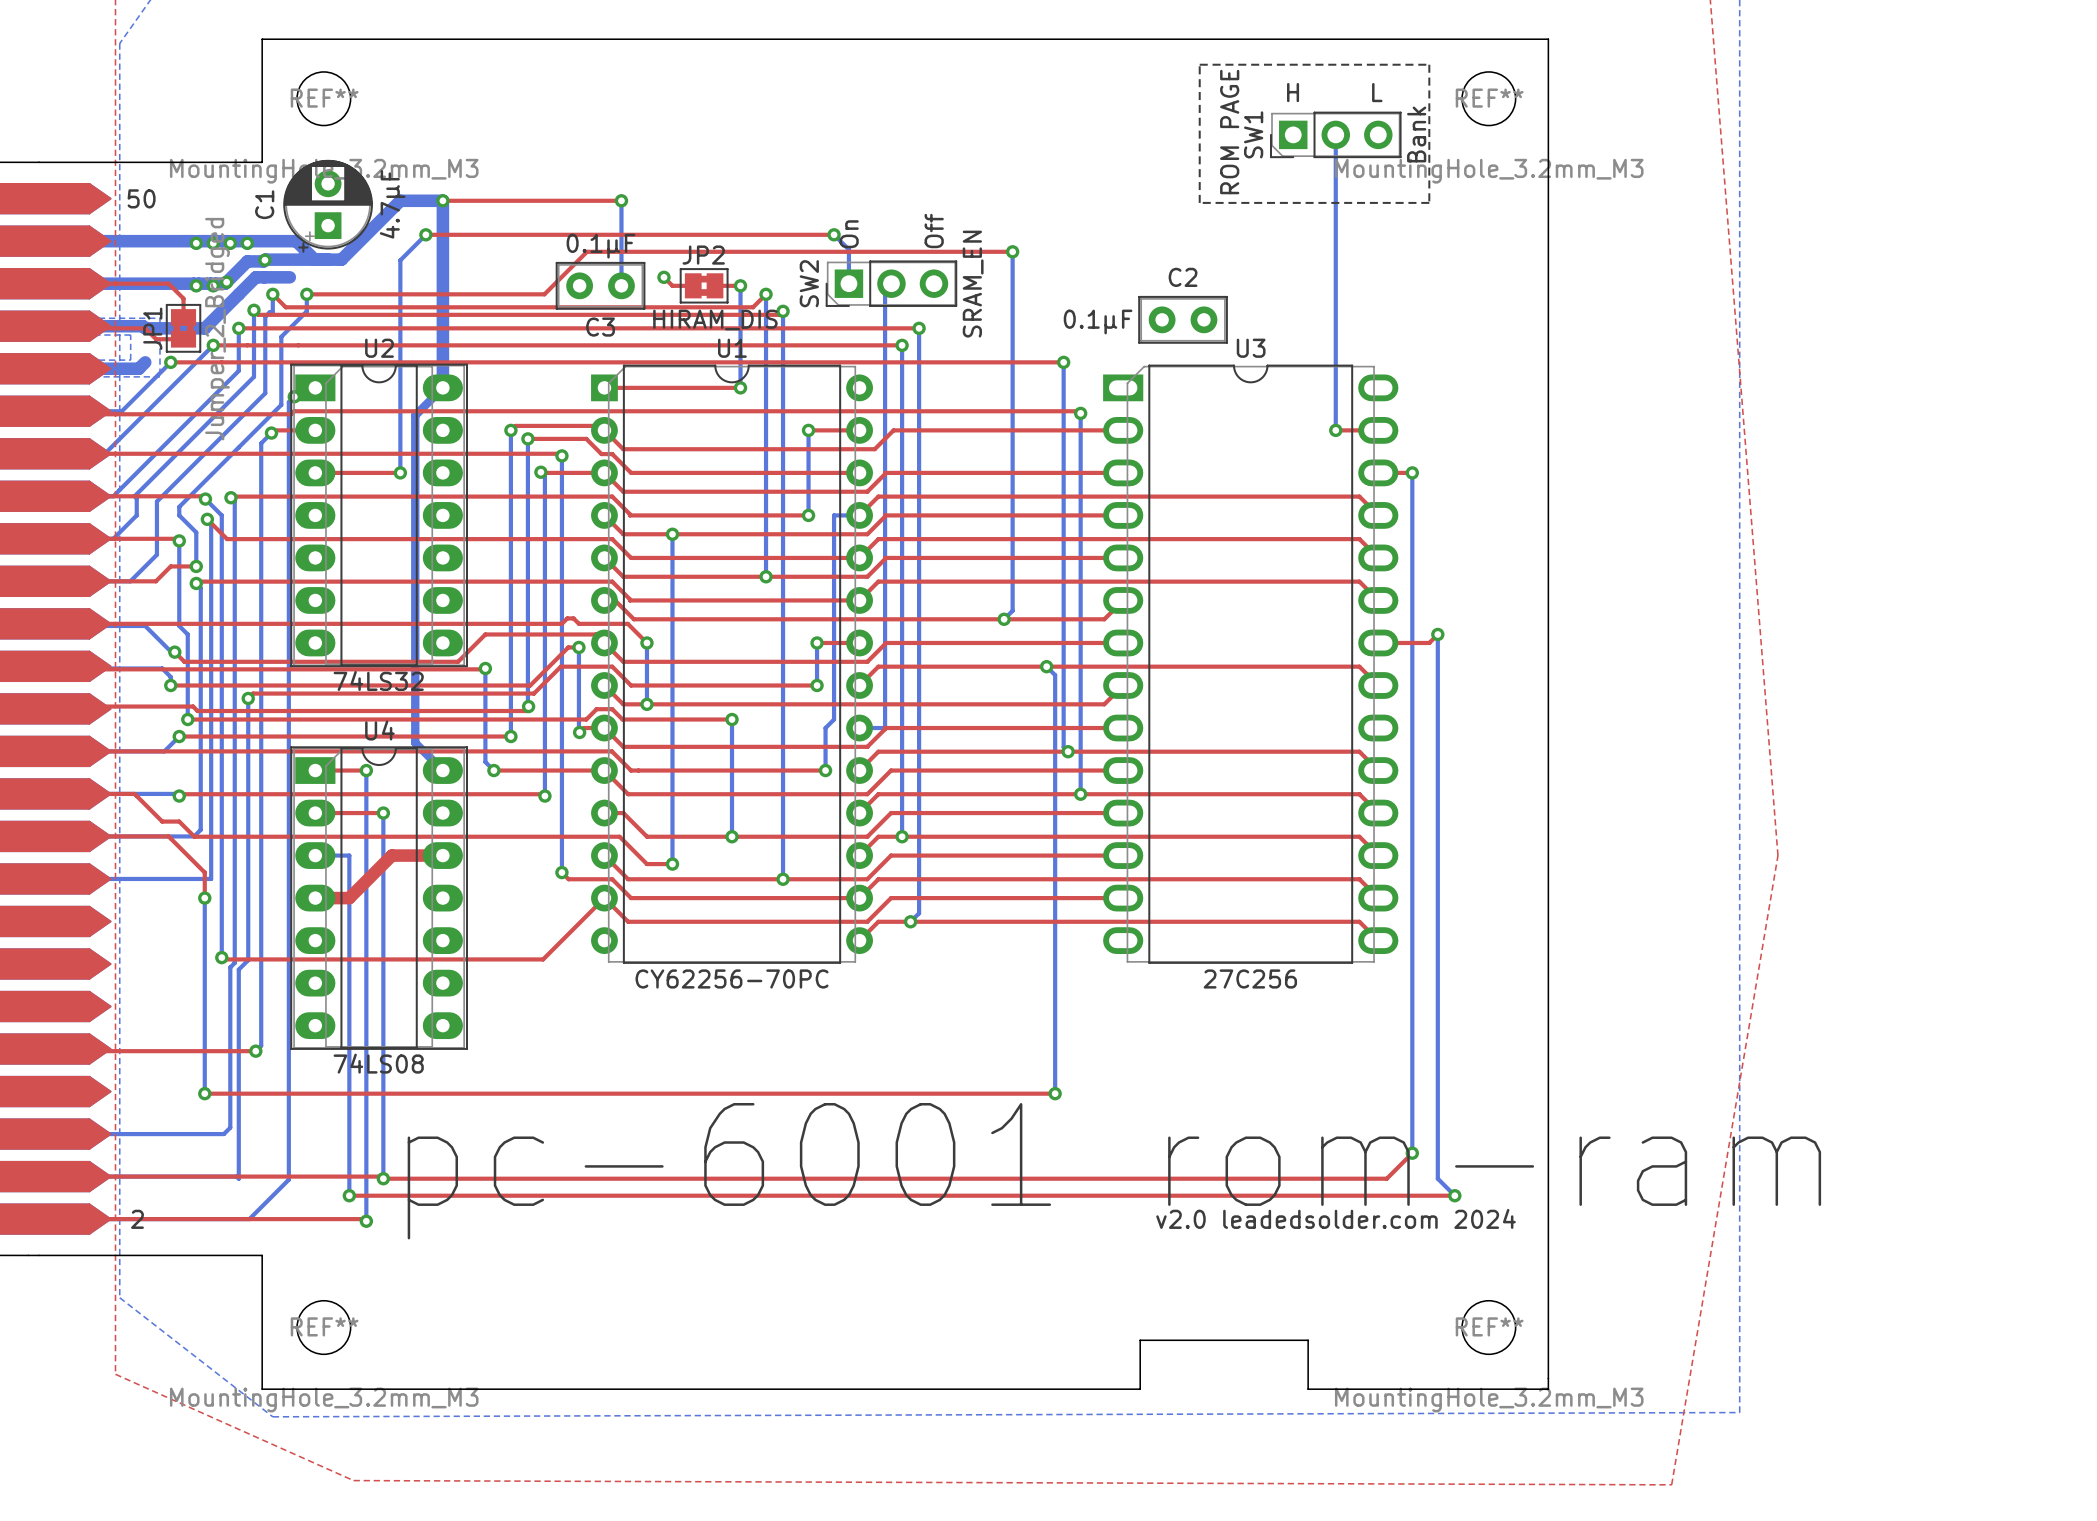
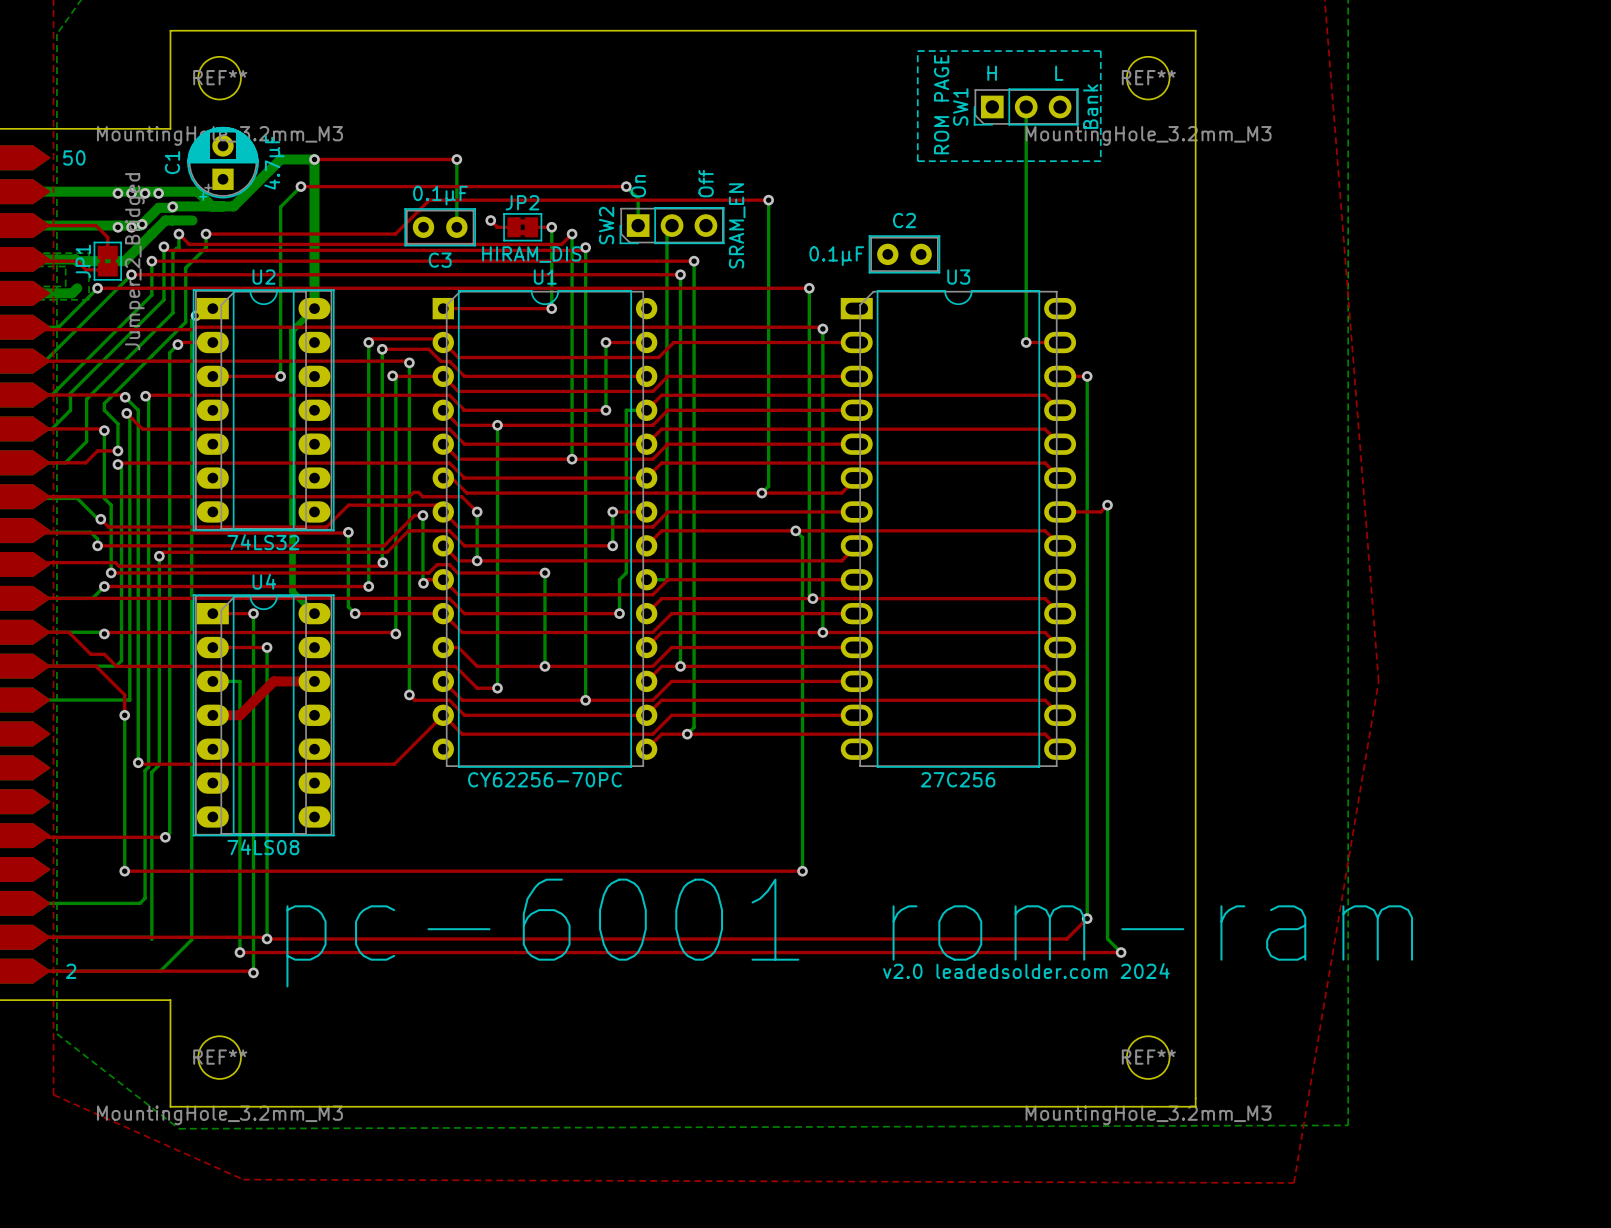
board edge: (1140, 1389) (1140, 1340) (1308, 1340) (1308, 1389) -> (870, 1106) (1004, 1106)

